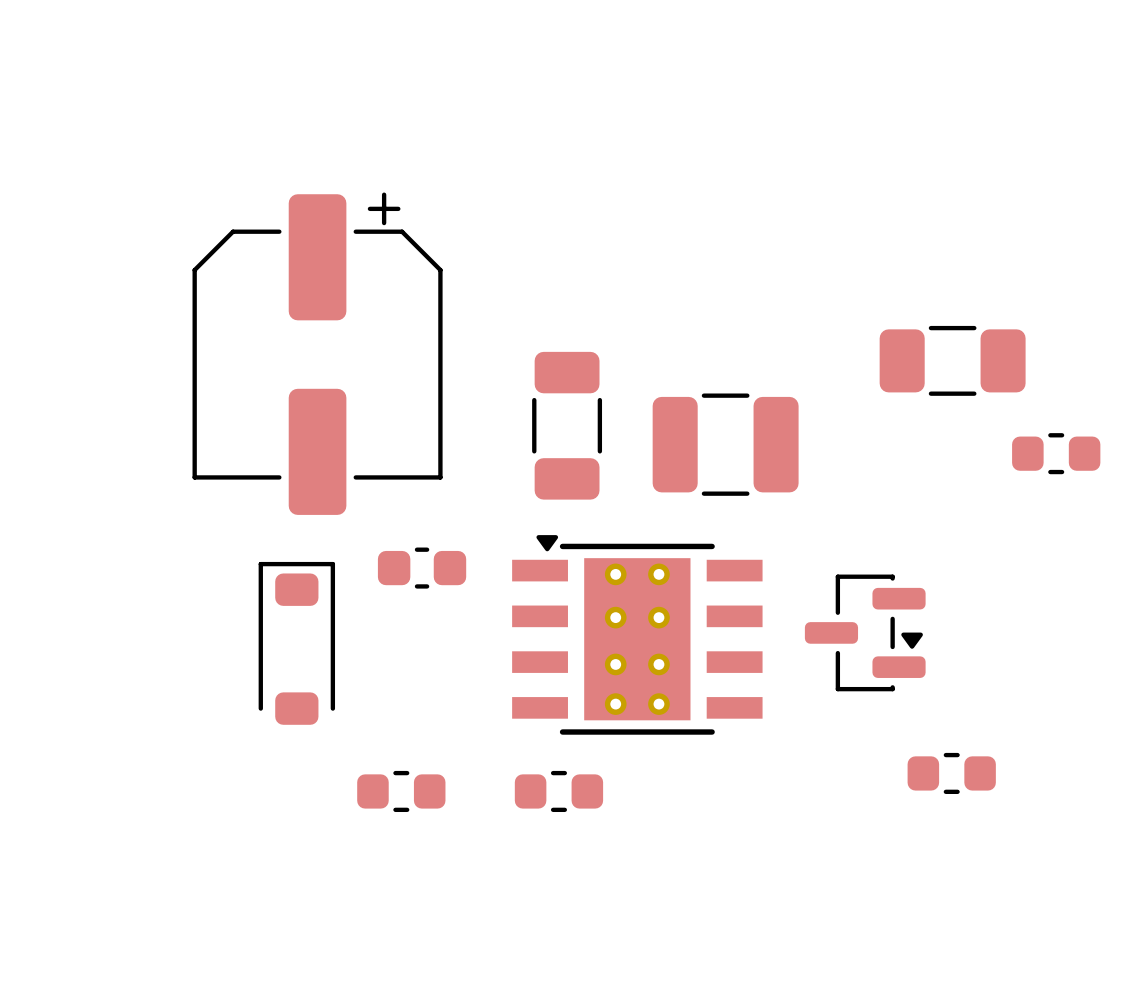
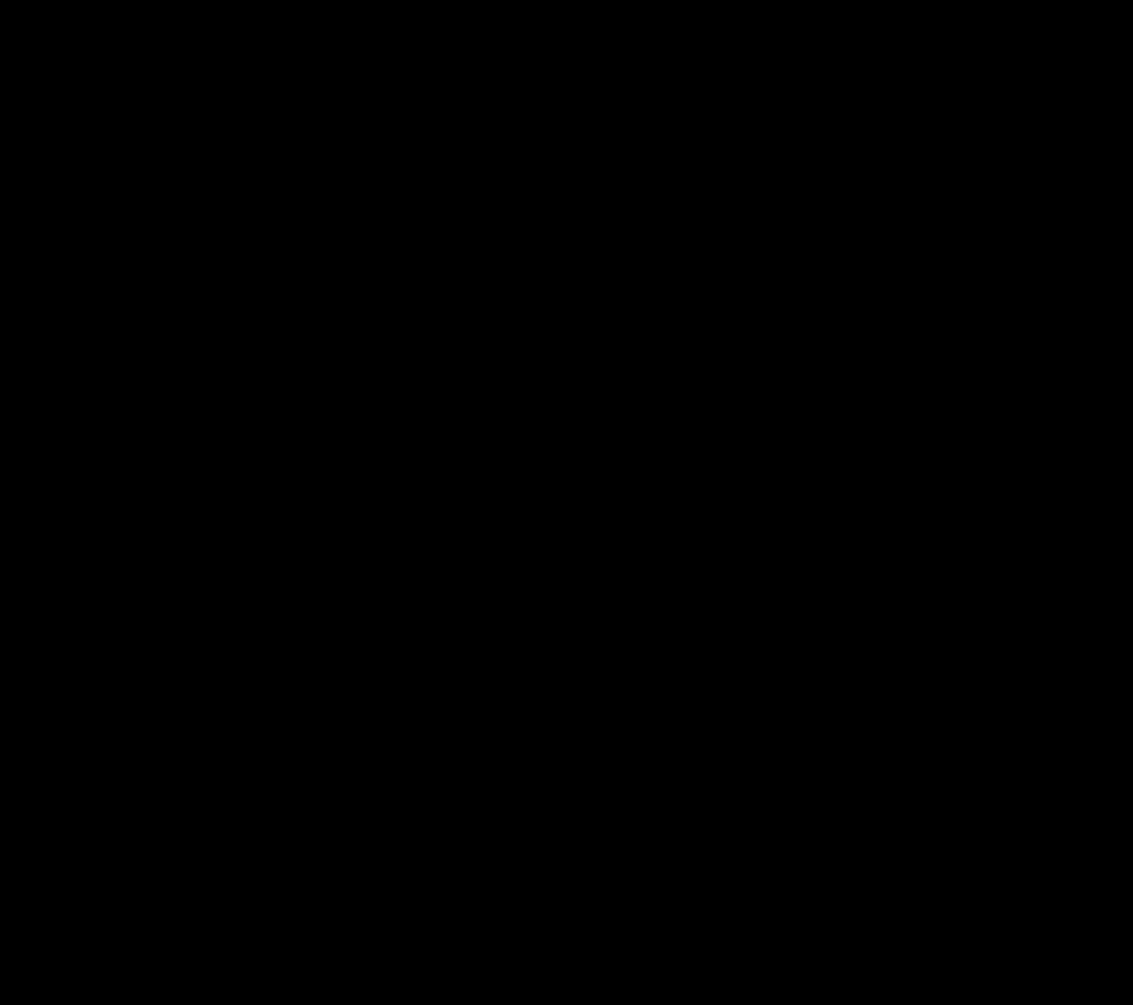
part: (317, 353) -> none
part: (952, 360) -> none
part: (567, 425) -> none
part: (725, 444) -> none
part: (1056, 453) -> none
part: (422, 568) -> none
part: (865, 632) -> none
part: (637, 634) -> none
part: (296, 643) -> none
part: (951, 773) -> none
part: (401, 791) -> none
part: (558, 791) -> none

